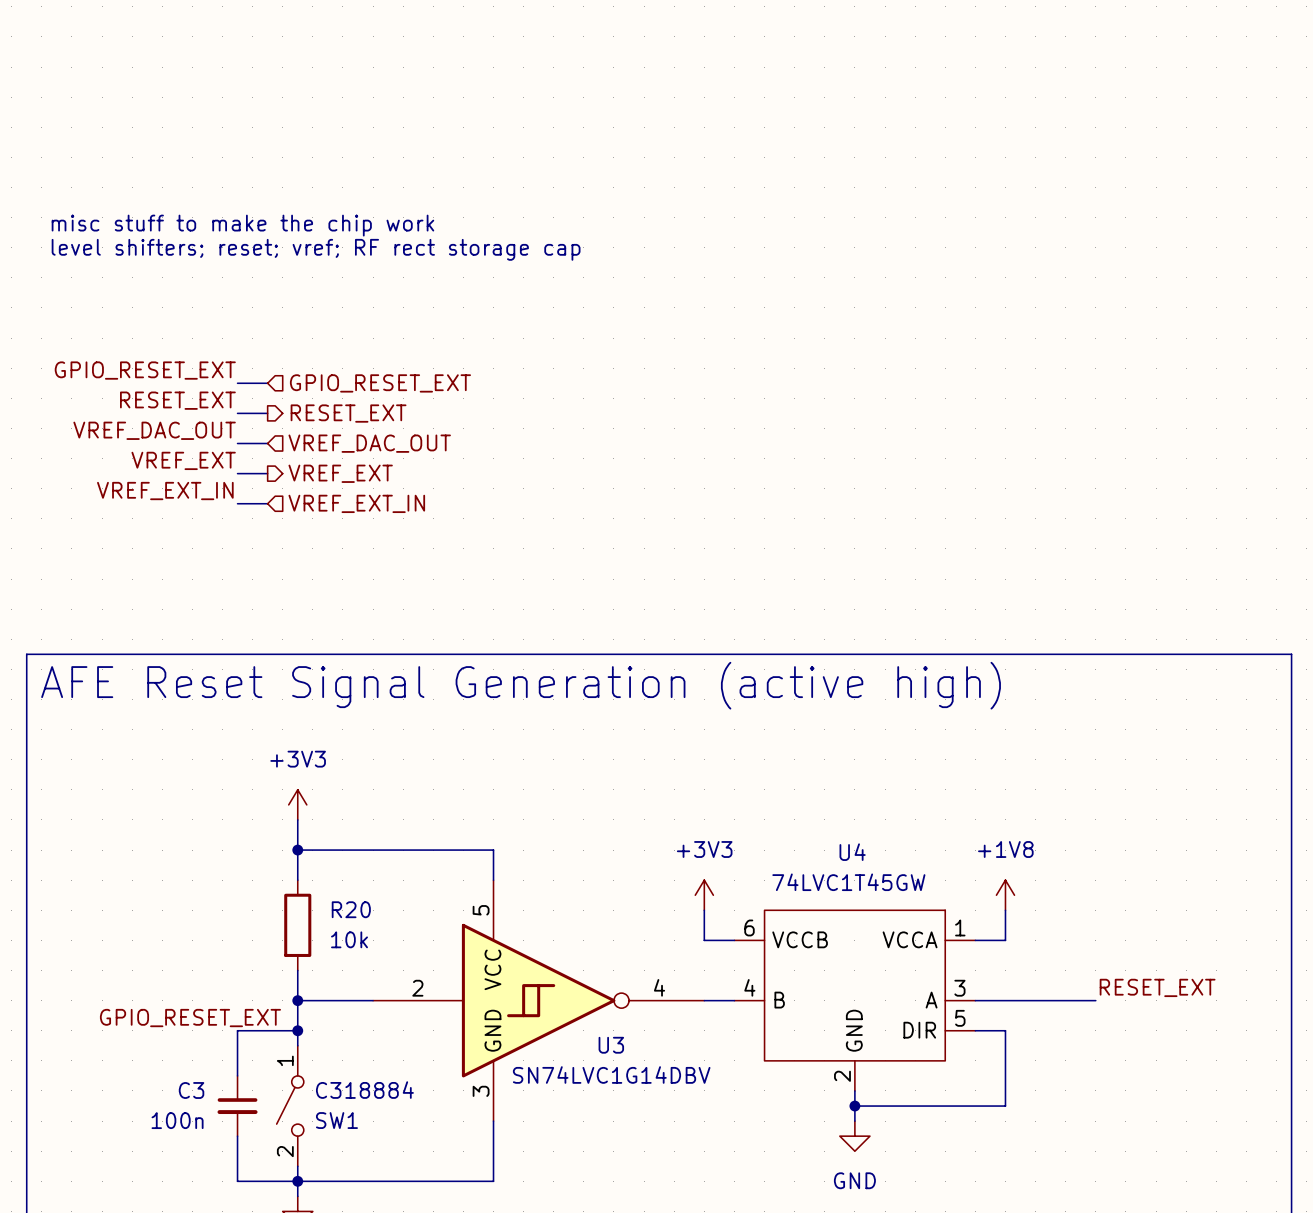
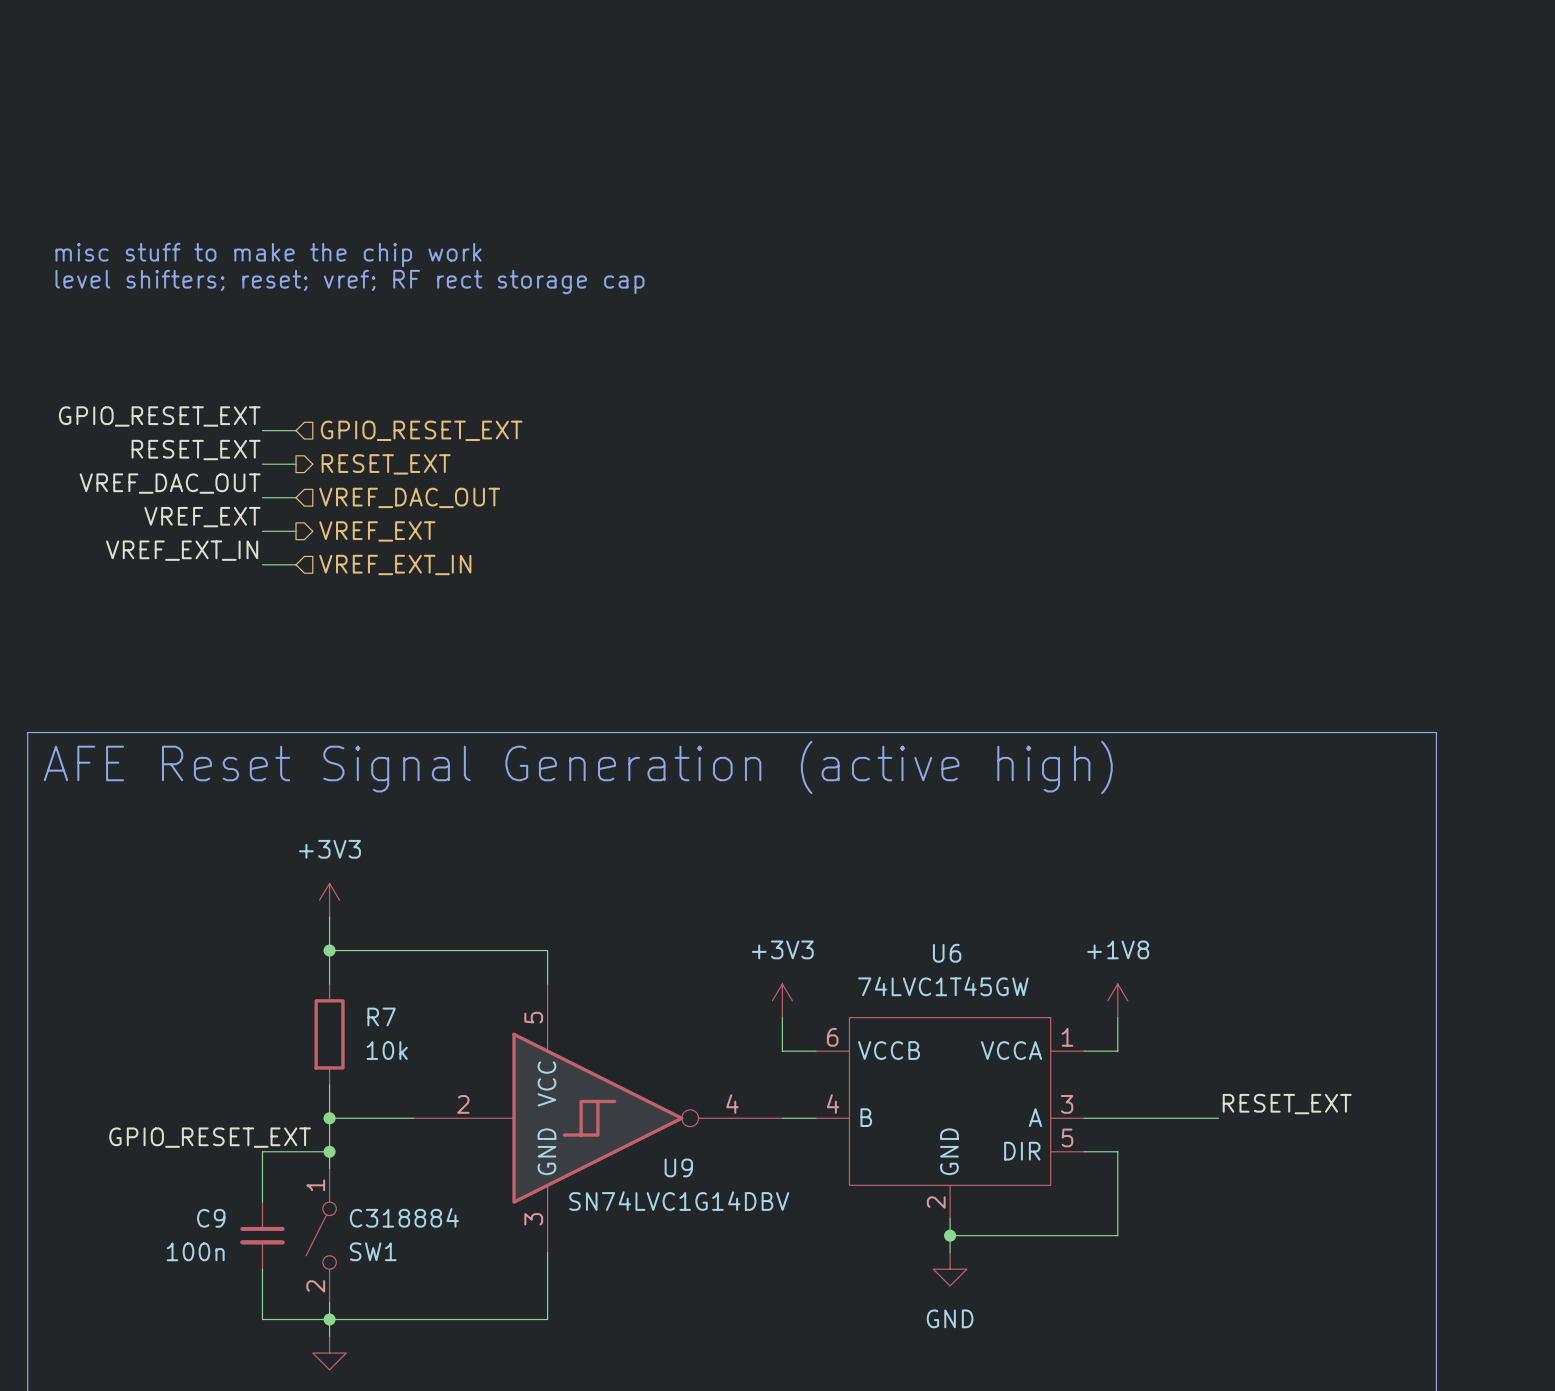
U4 name: U4 (852, 852) -> U6 (947, 953)
R20 name: R20 (351, 909) -> R7 (381, 1016)
U3 name: U3 (611, 1045) -> U9 (678, 1167)
C3 name: C3 (191, 1090) -> C9 (211, 1218)

